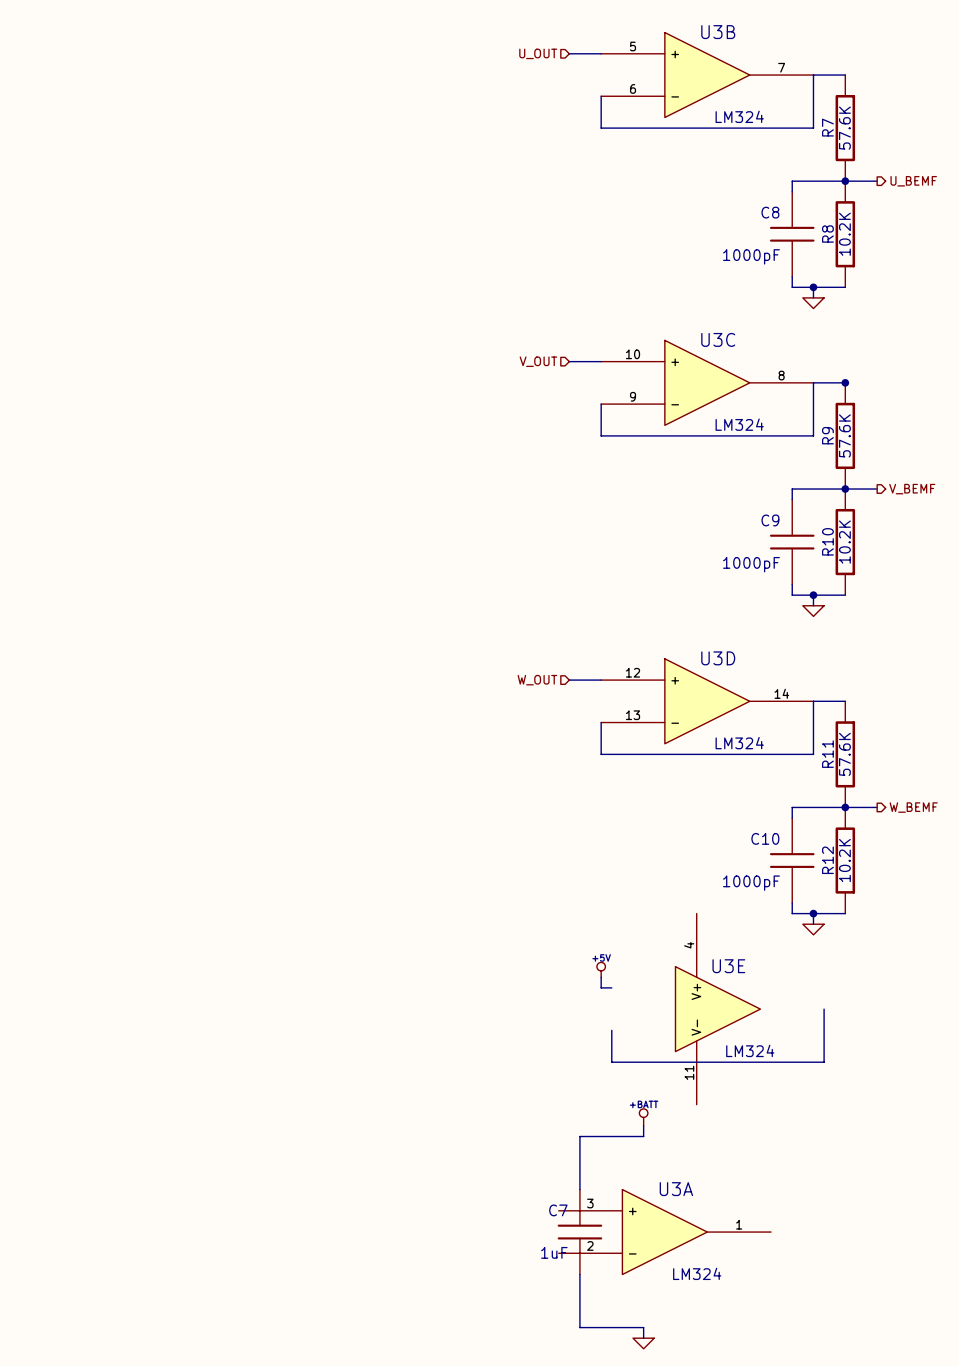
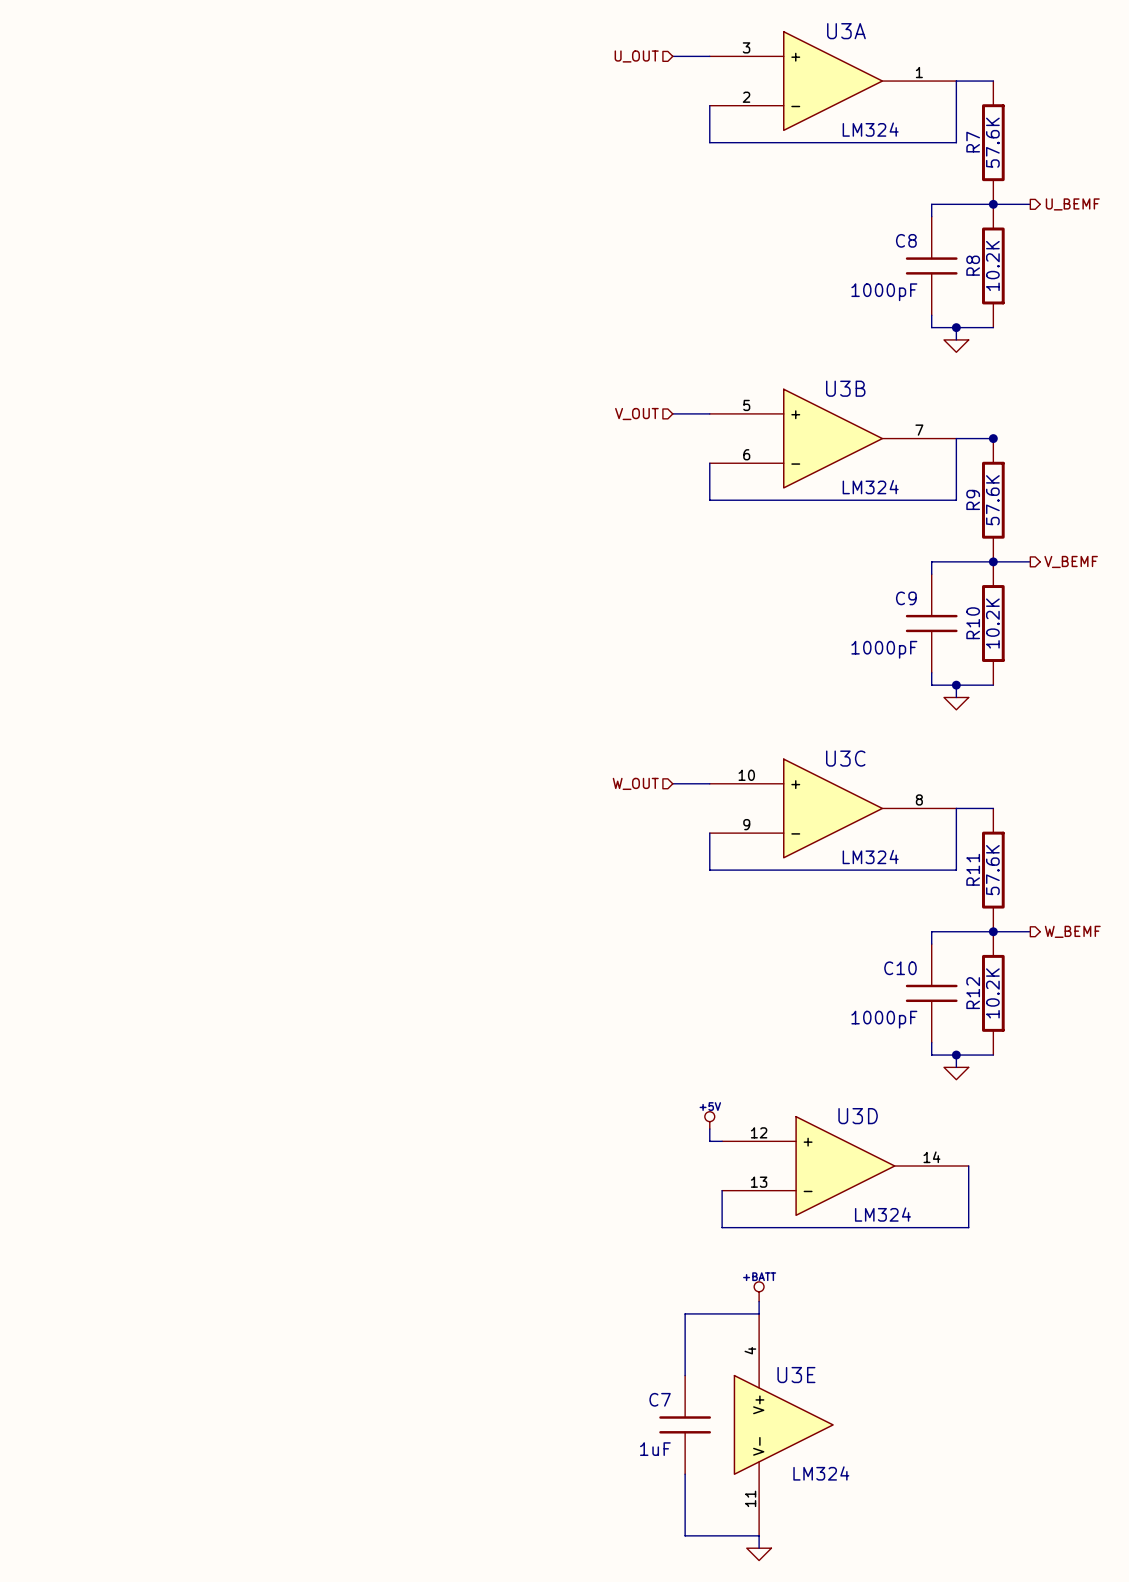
U3B position: (707, 75) -> (833, 438)
U3C position: (707, 382) -> (833, 808)
U3D position: (707, 701) -> (845, 1166)
U3E position: (717, 1009) -> (783, 1424)
U3A position: (664, 1232) -> (833, 81)

